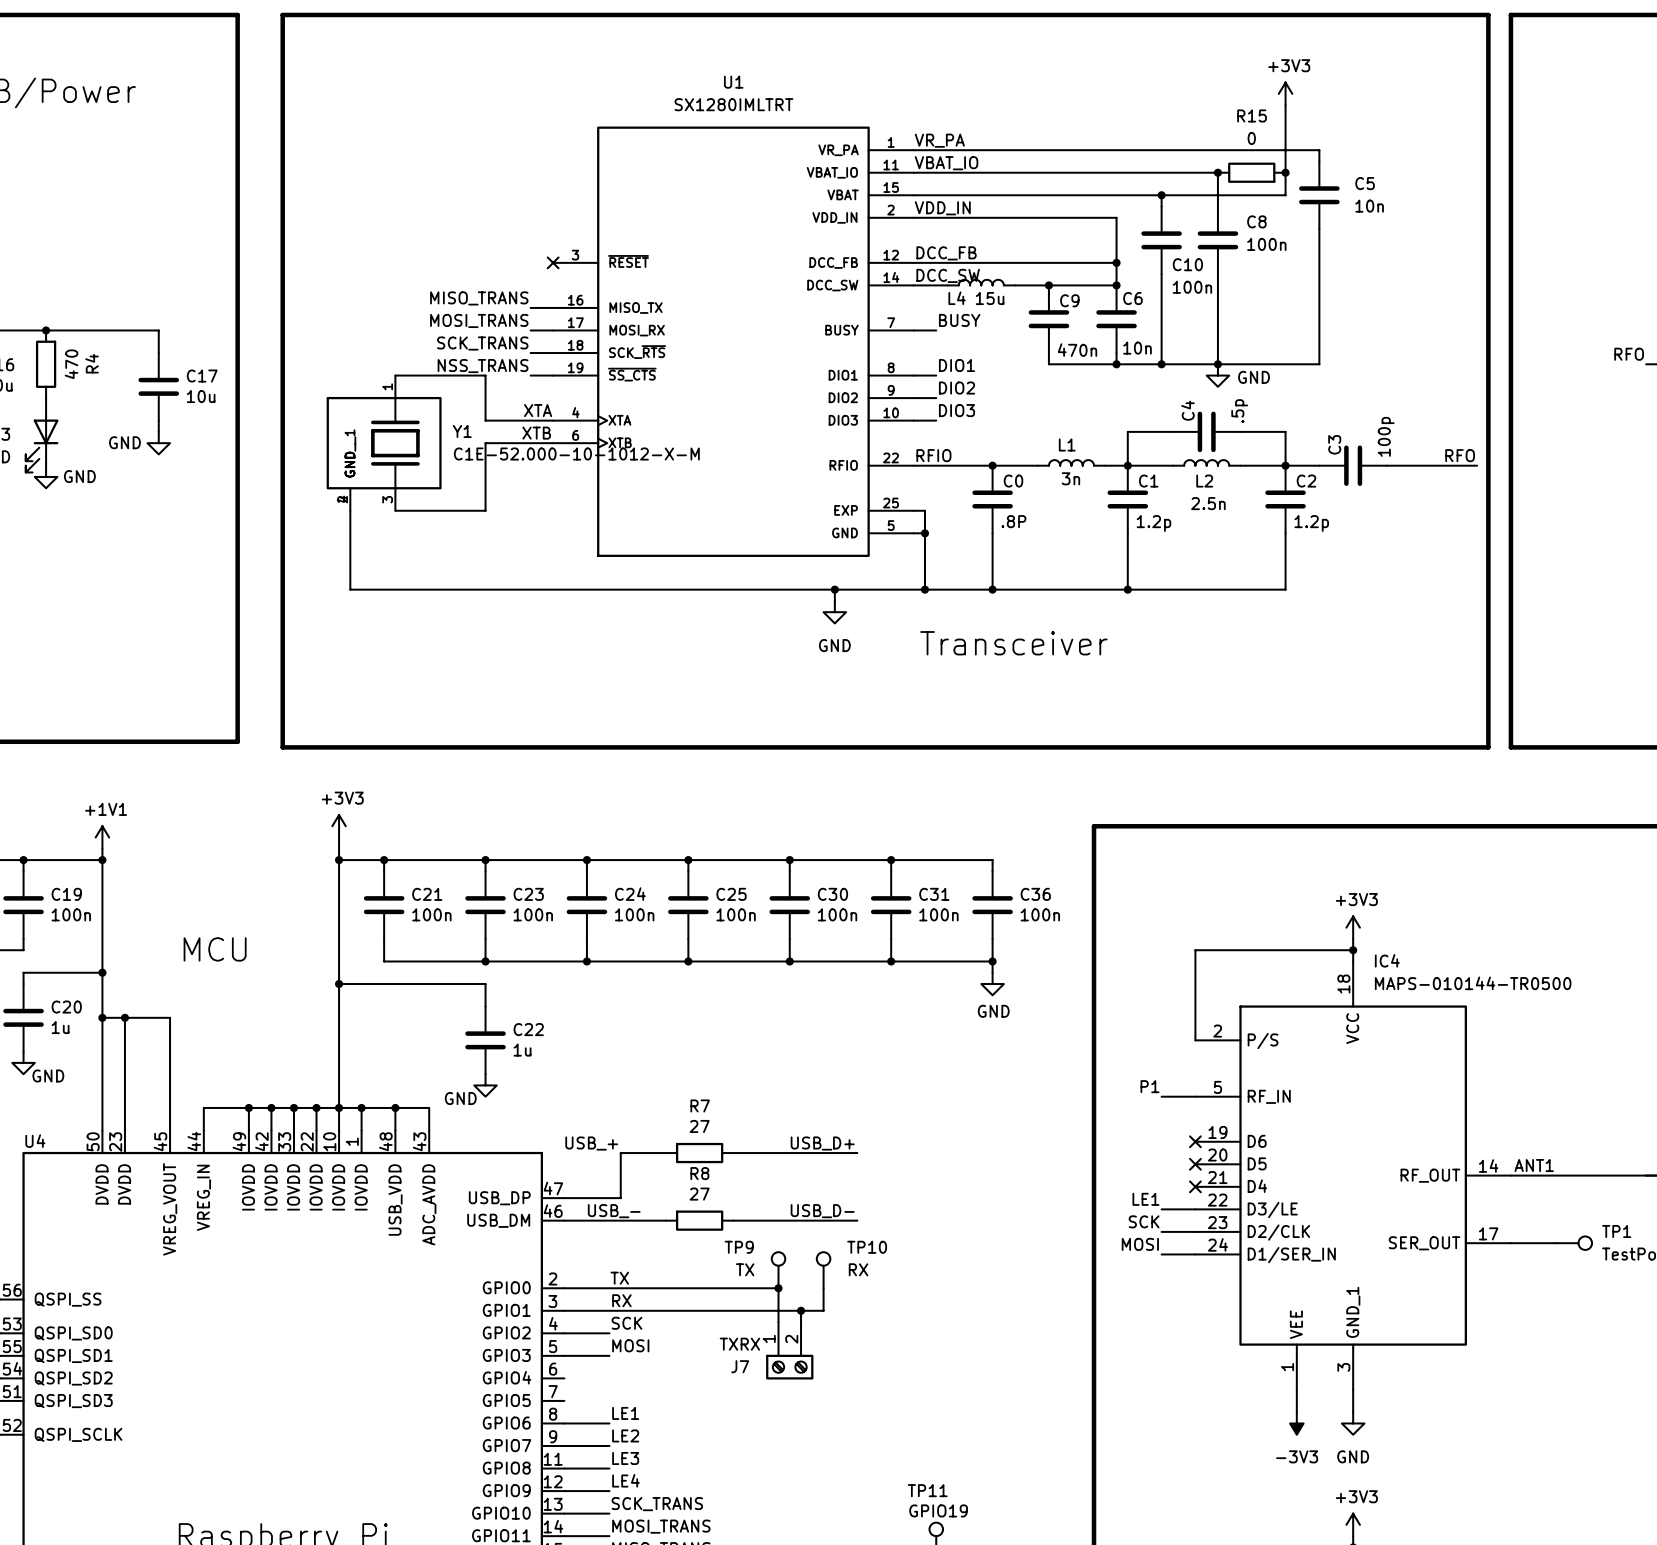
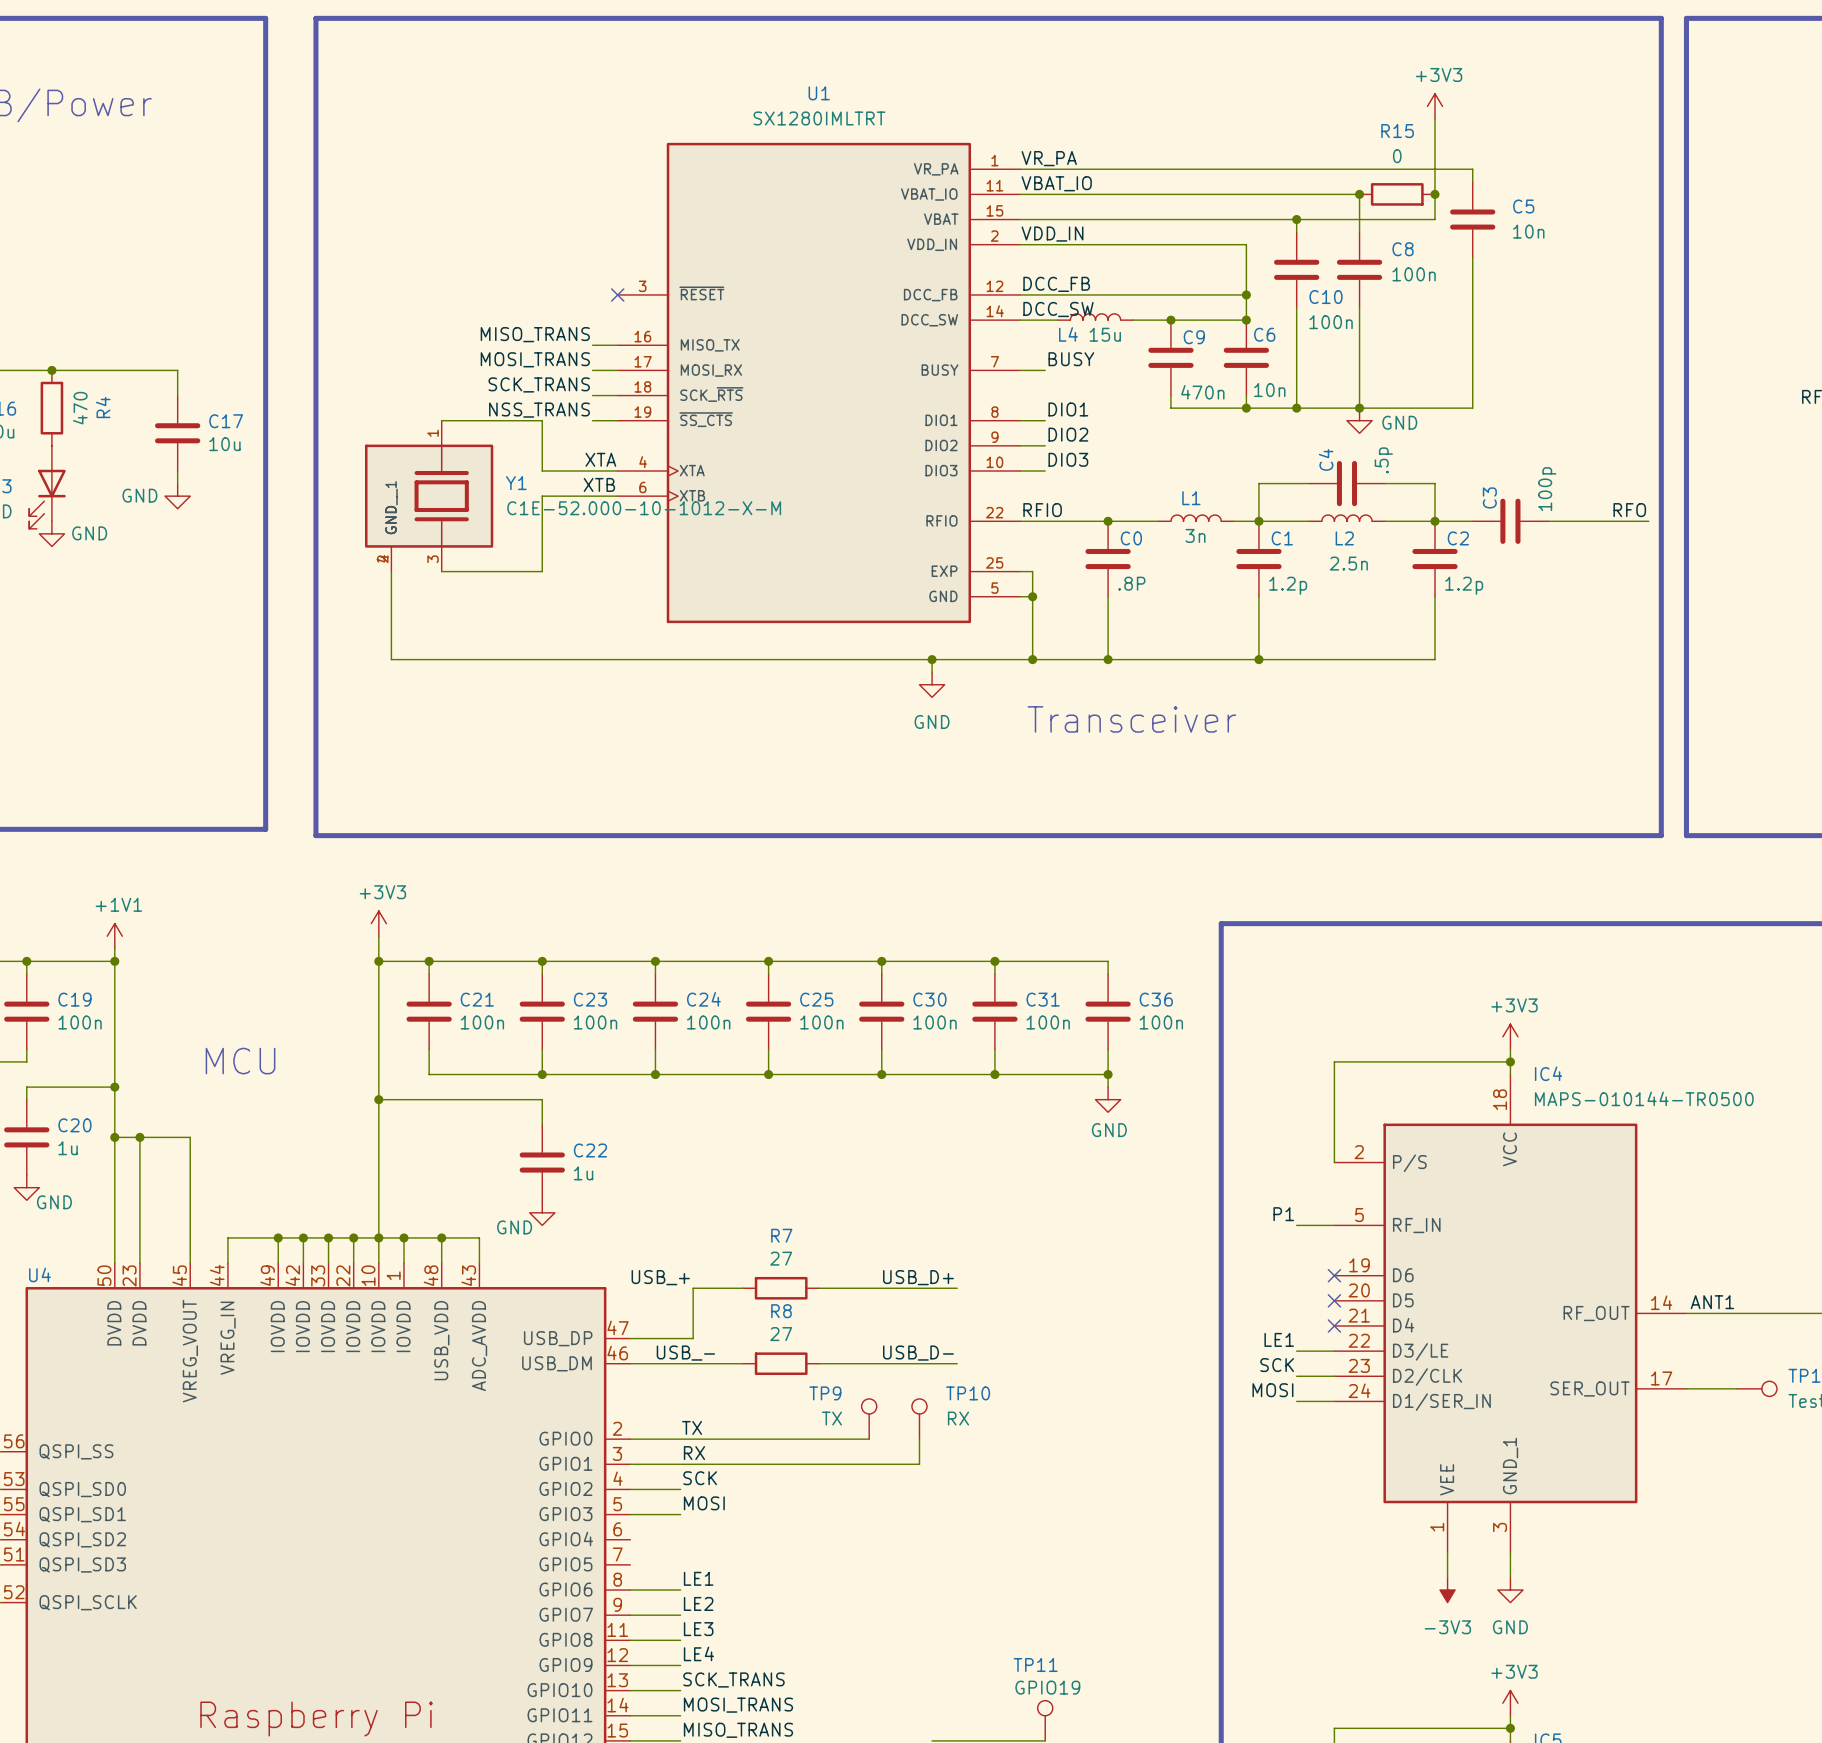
wire: (778, 1288) (778, 1322) -> none
junction: (778, 1288) -> none
wire: (801, 1310) (801, 1322) -> none
junction: (801, 1310) -> none
J7: TXRX (789, 1350) -> none

